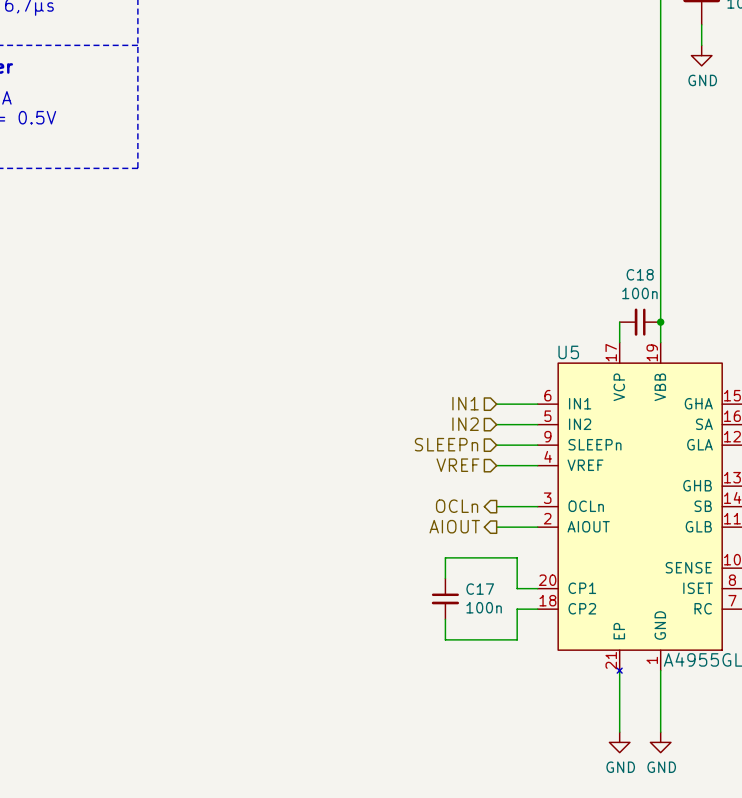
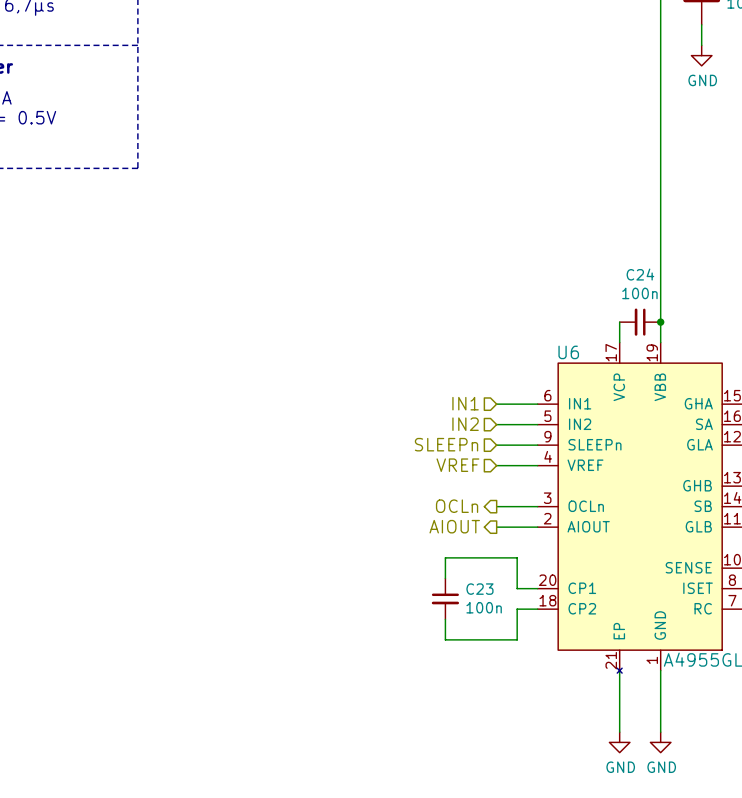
C18 name: C18 (640, 274) -> C24 (640, 274)
U5 name: U5 (568, 352) -> U6 (568, 352)
C17 name: C17 (480, 589) -> C23 (479, 589)

